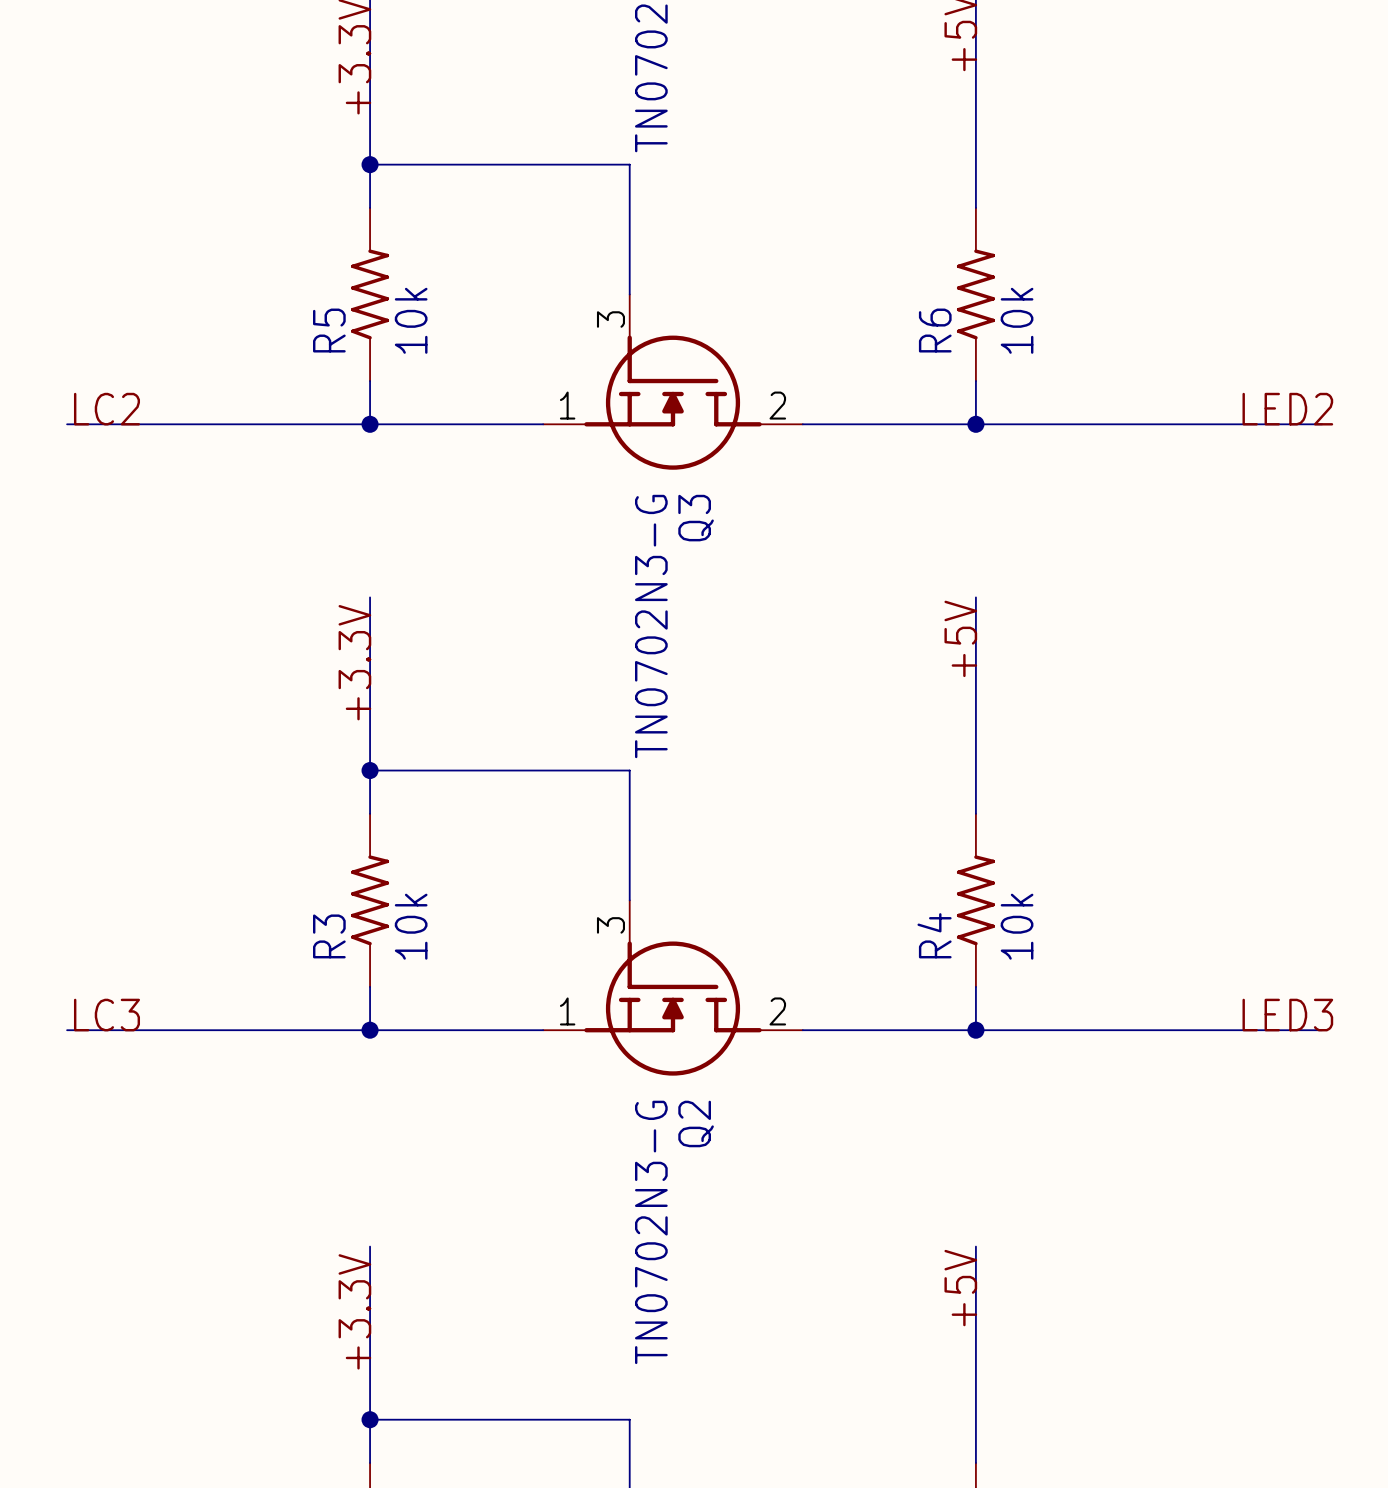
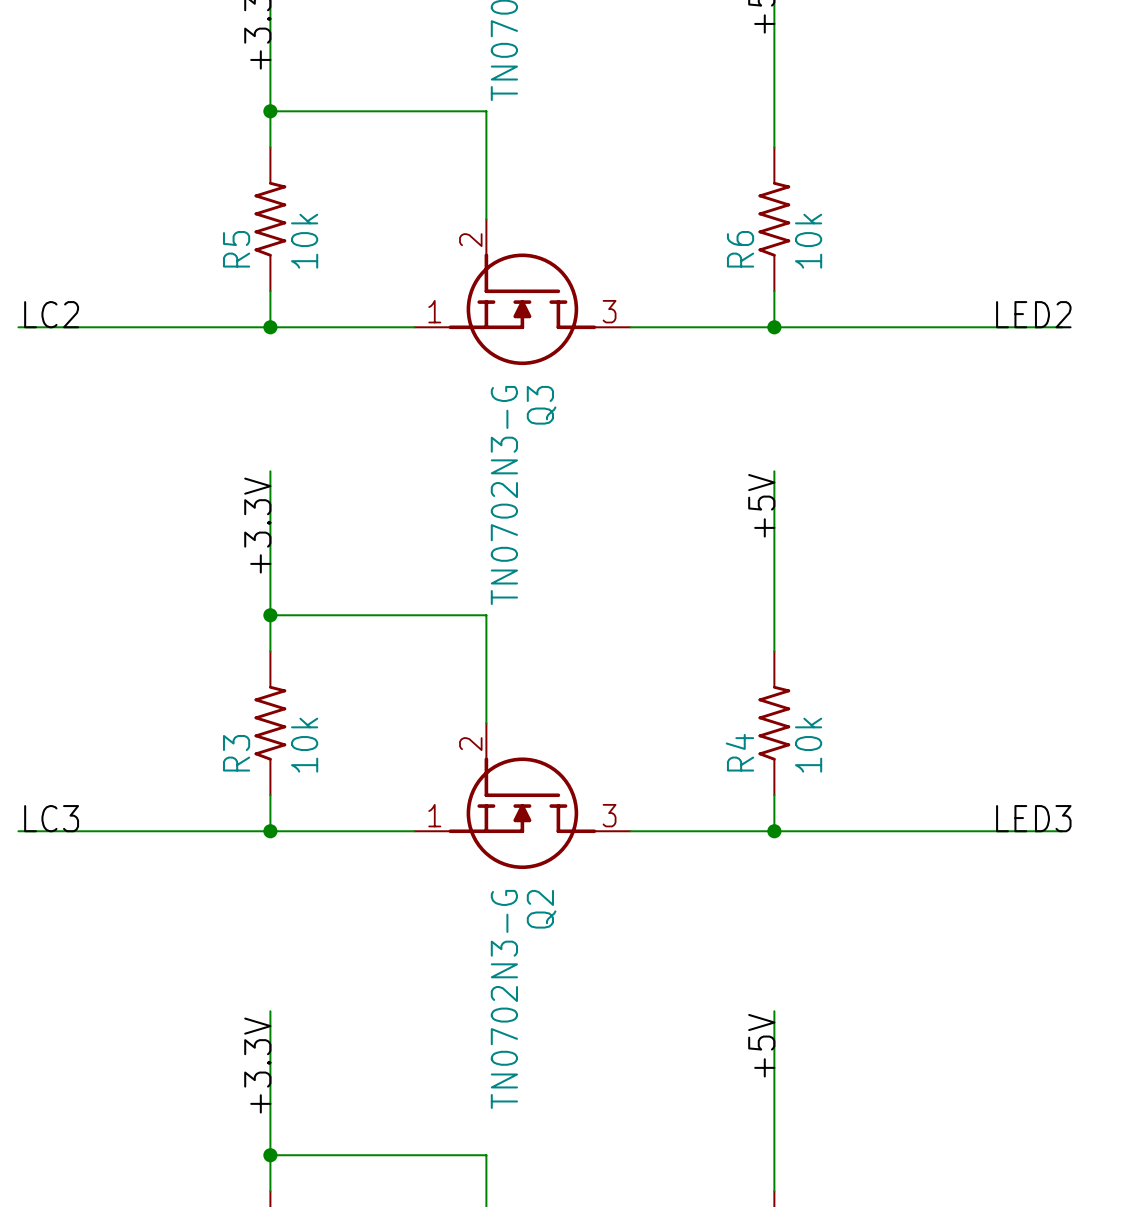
Q3 pin number: 3 (610, 319) -> 2 (470, 240)
Q3 pin number: 2 (777, 405) -> 3 (609, 311)
Q2 pin number: 3 (610, 925) -> 2 (470, 744)
Q2 pin number: 2 (777, 1011) -> 3 (609, 815)

